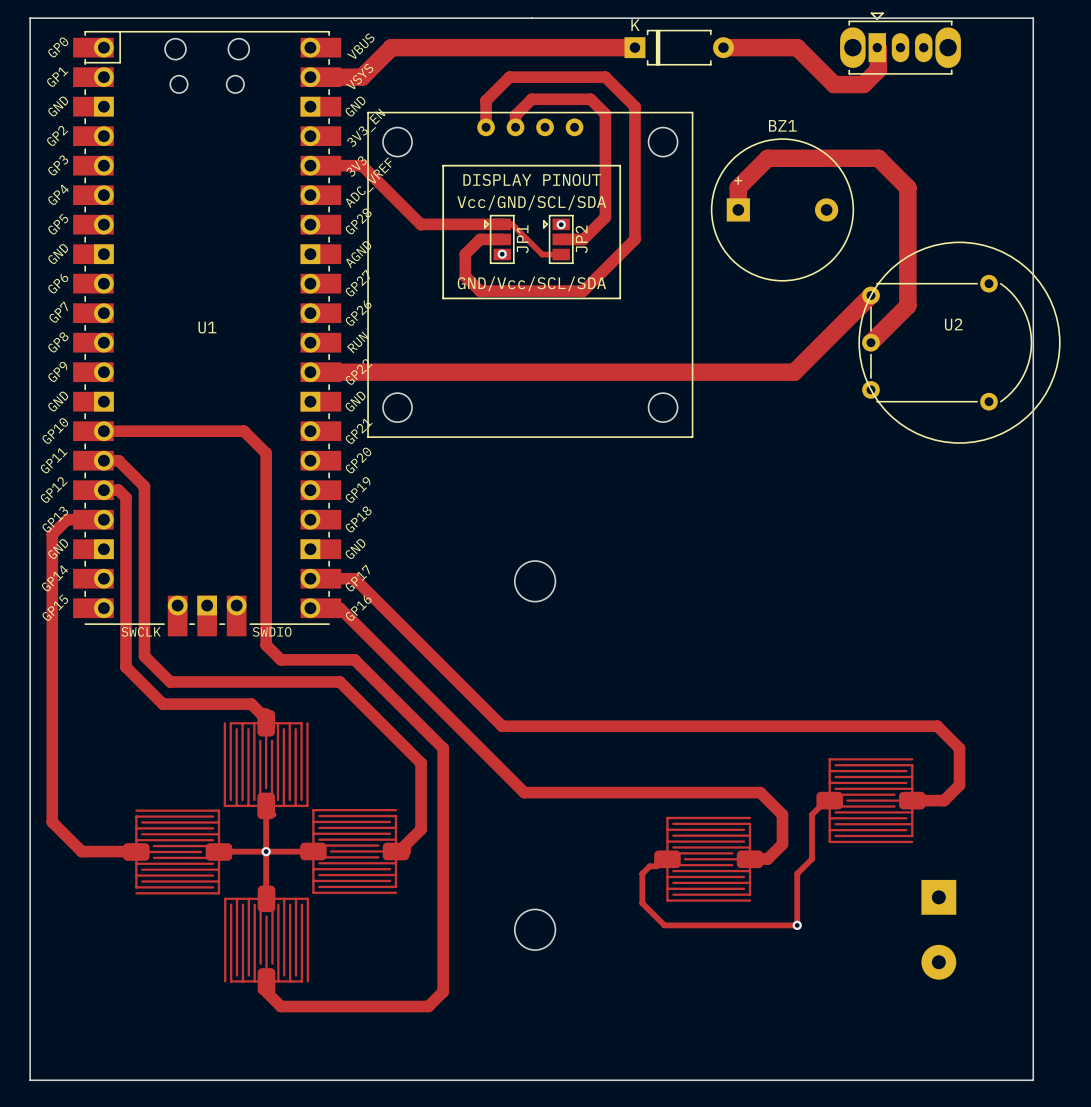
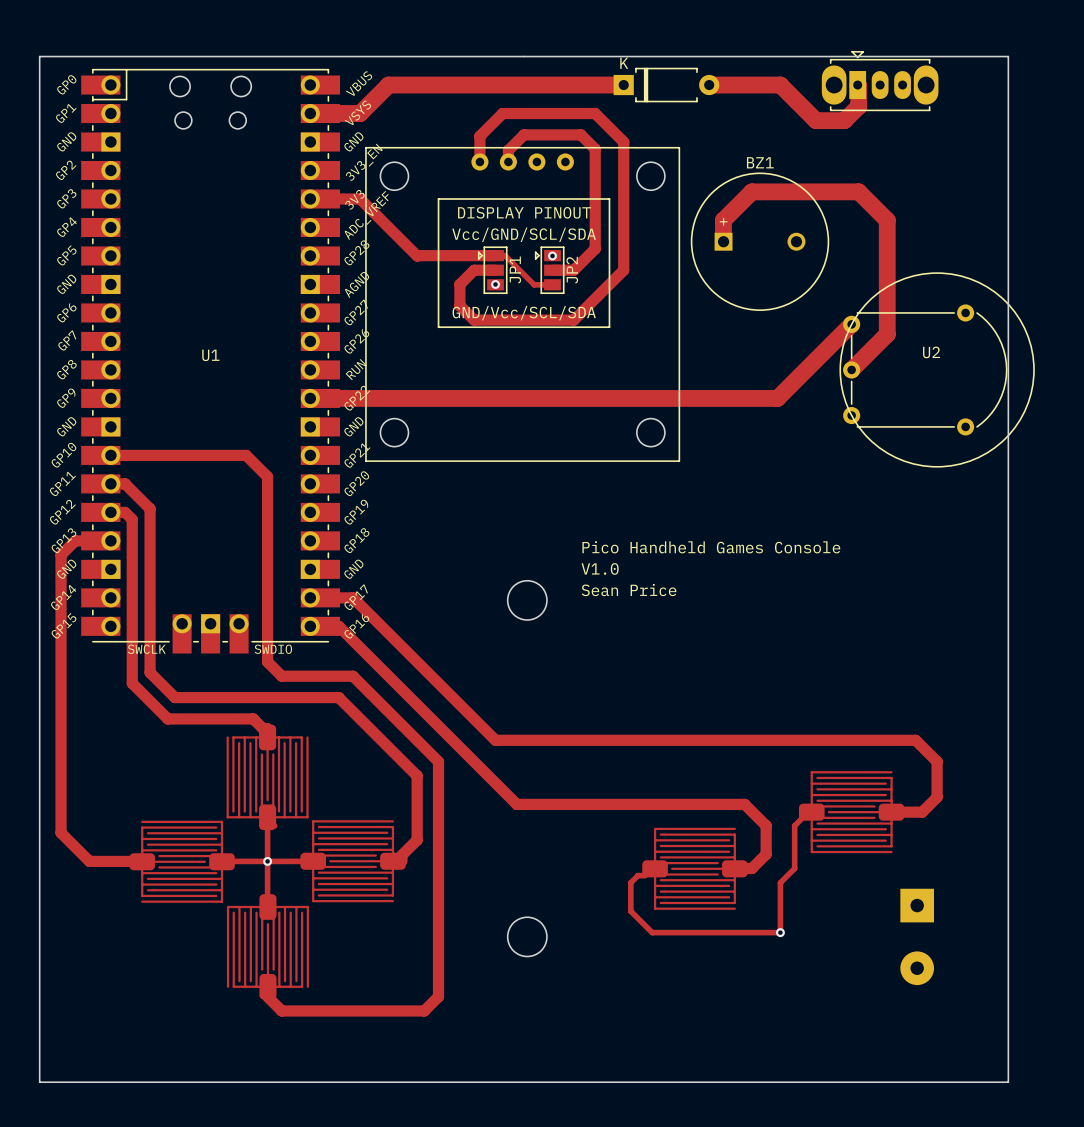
BZ1 footprint: [710, 138, 855, 282] -> [690, 172, 830, 311]
text: none -> Pico Handheld Games Console (711, 547)
text: none -> V1.0 (600, 568)
text: none -> Sean Price (629, 590)

